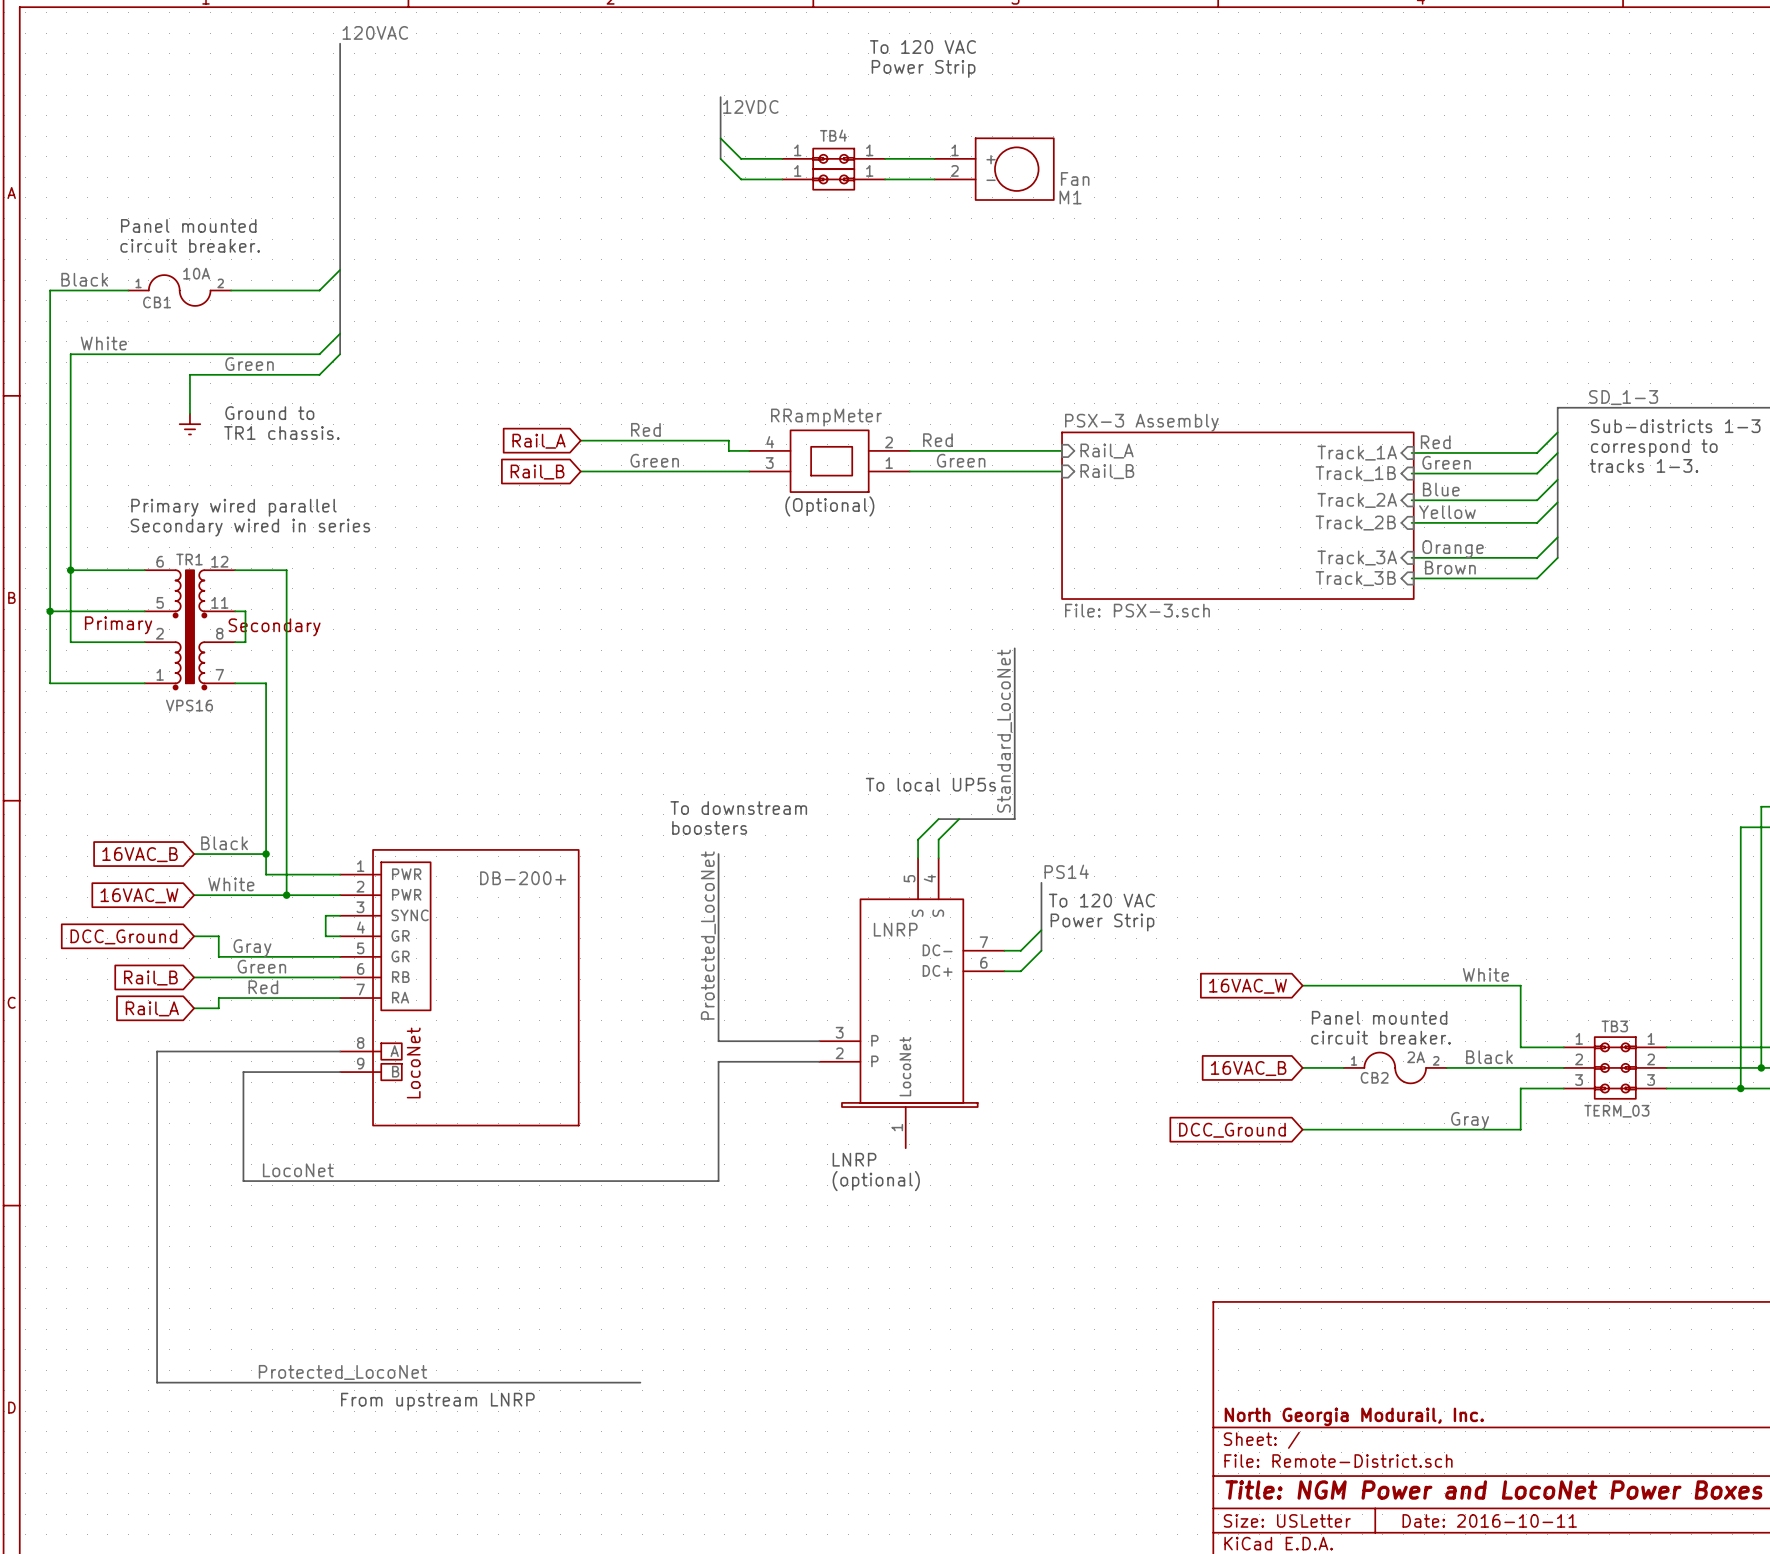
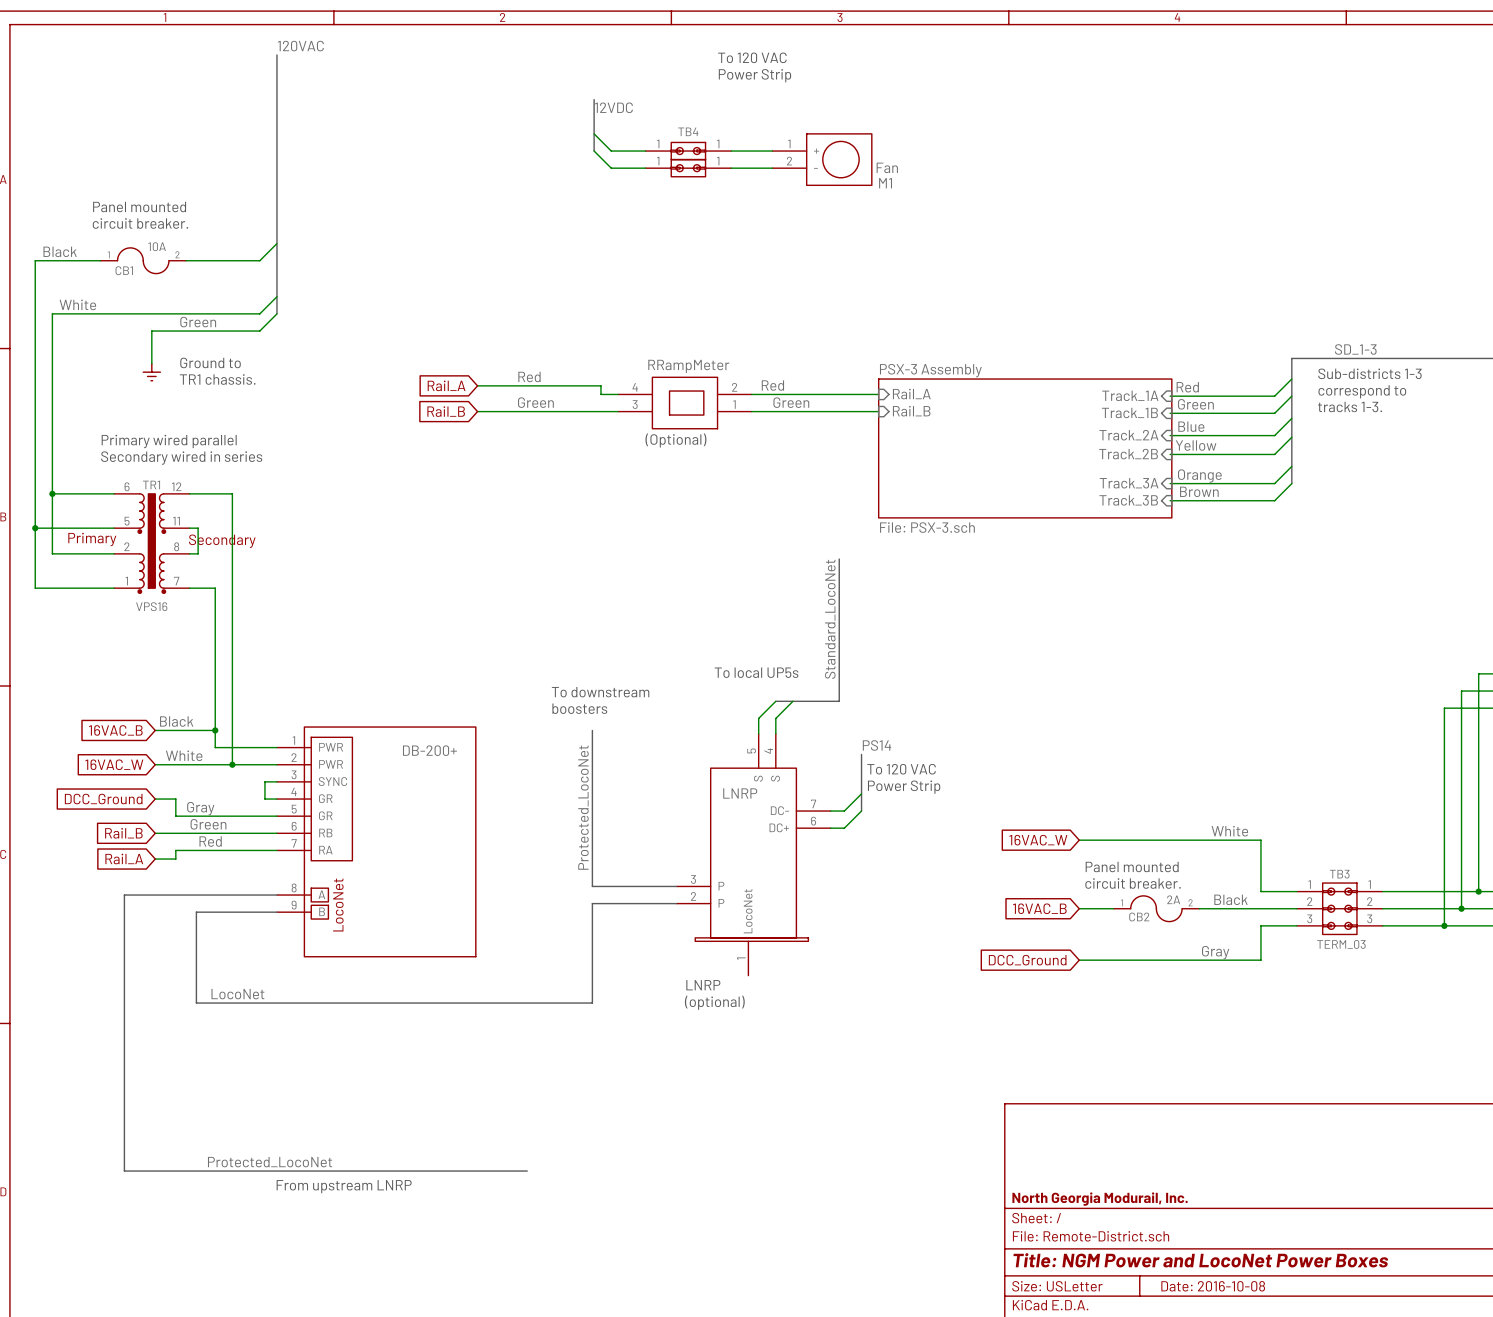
title block: Date: 2016-10-11 (1489, 1520) -> Date: 2016-10-08 (1213, 1286)

